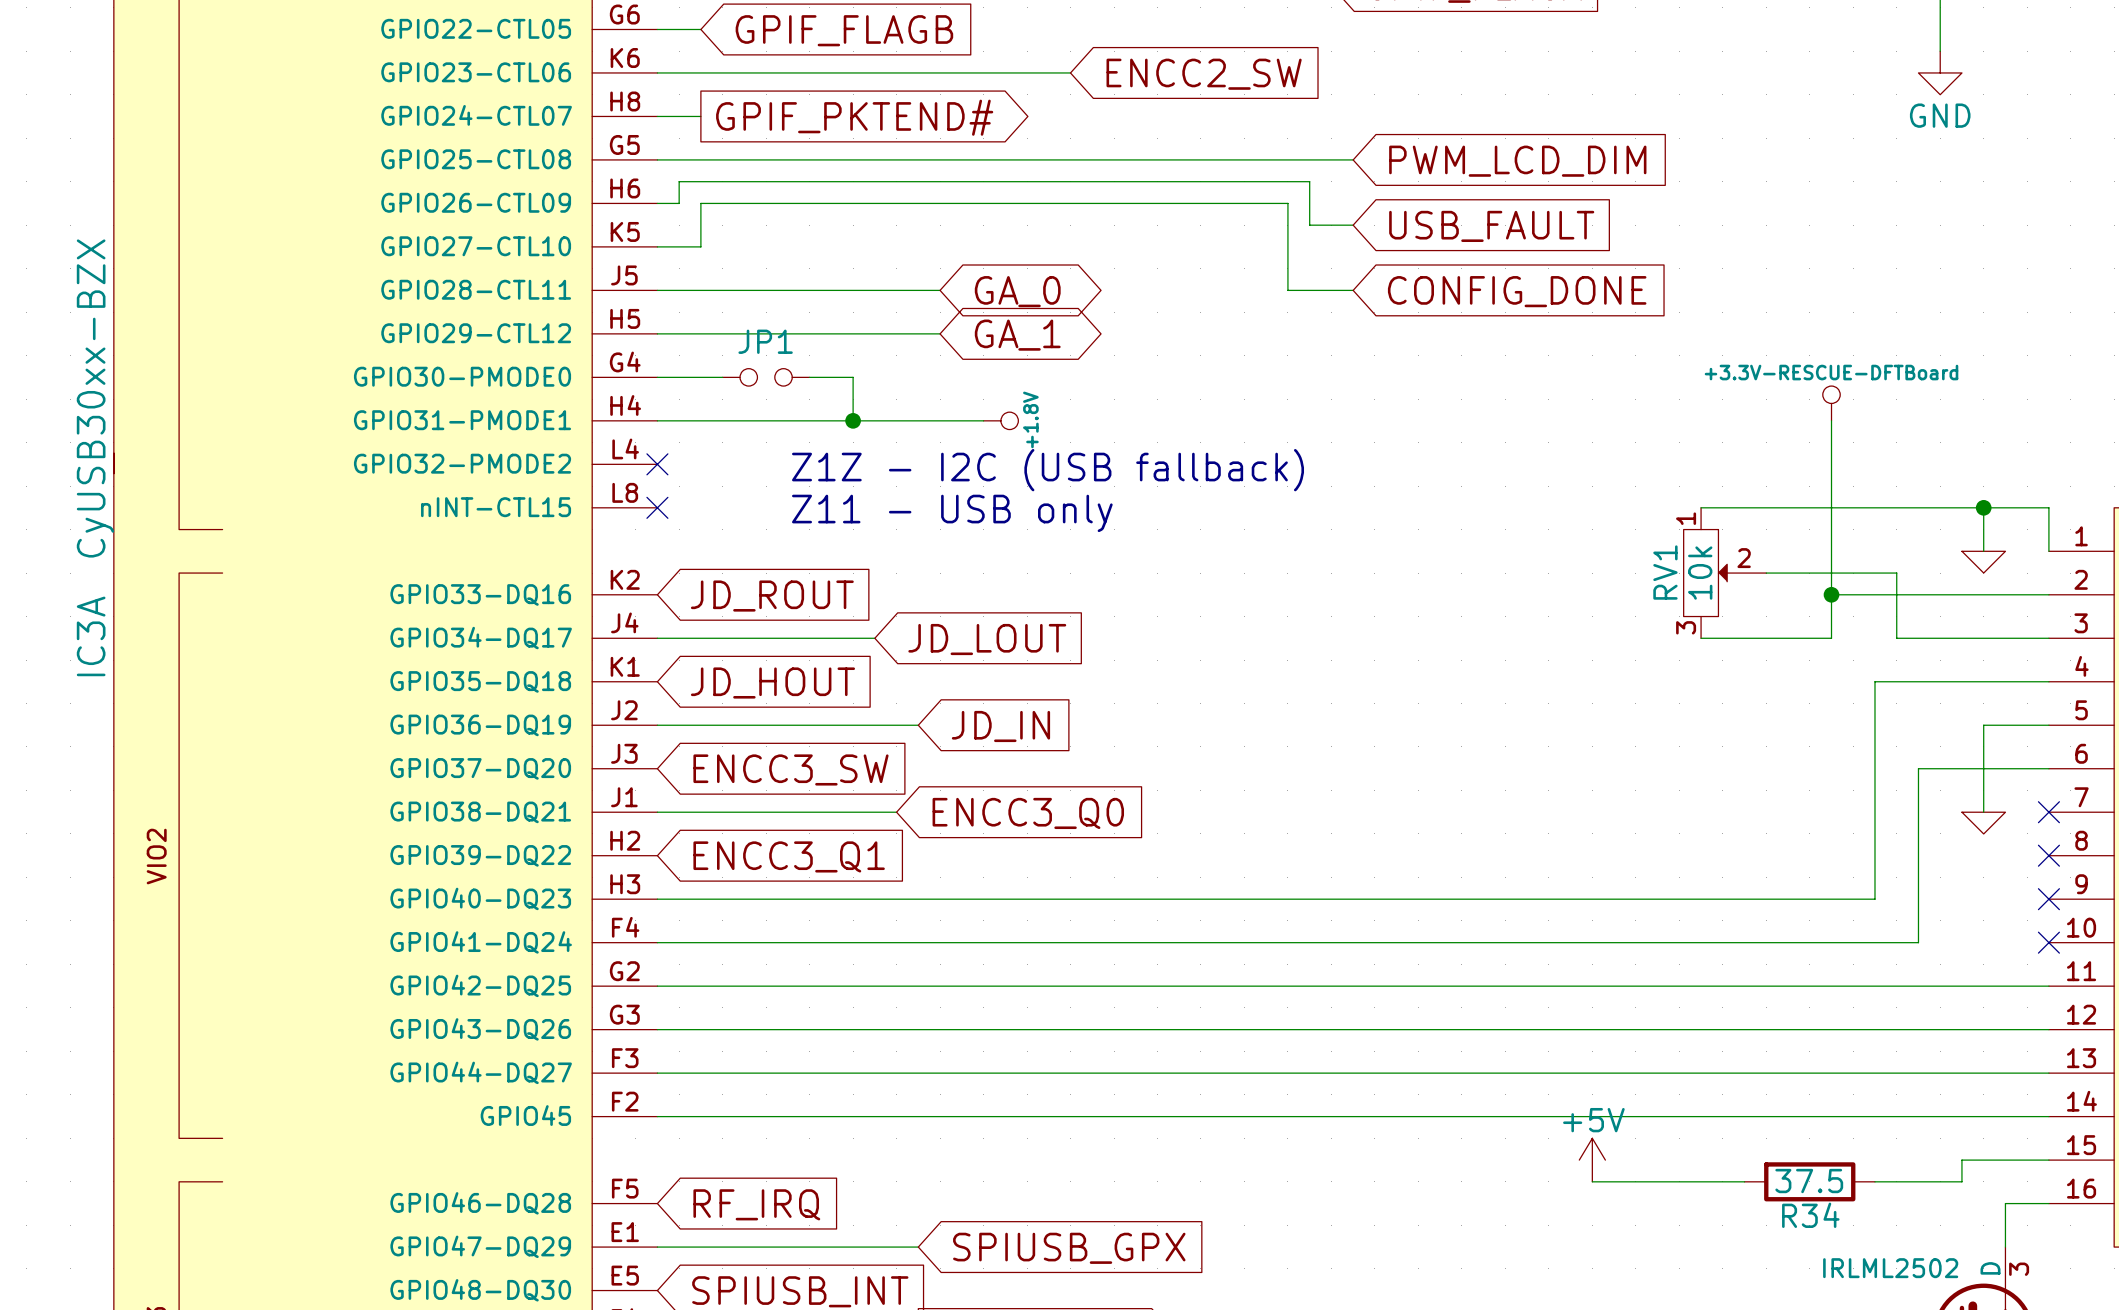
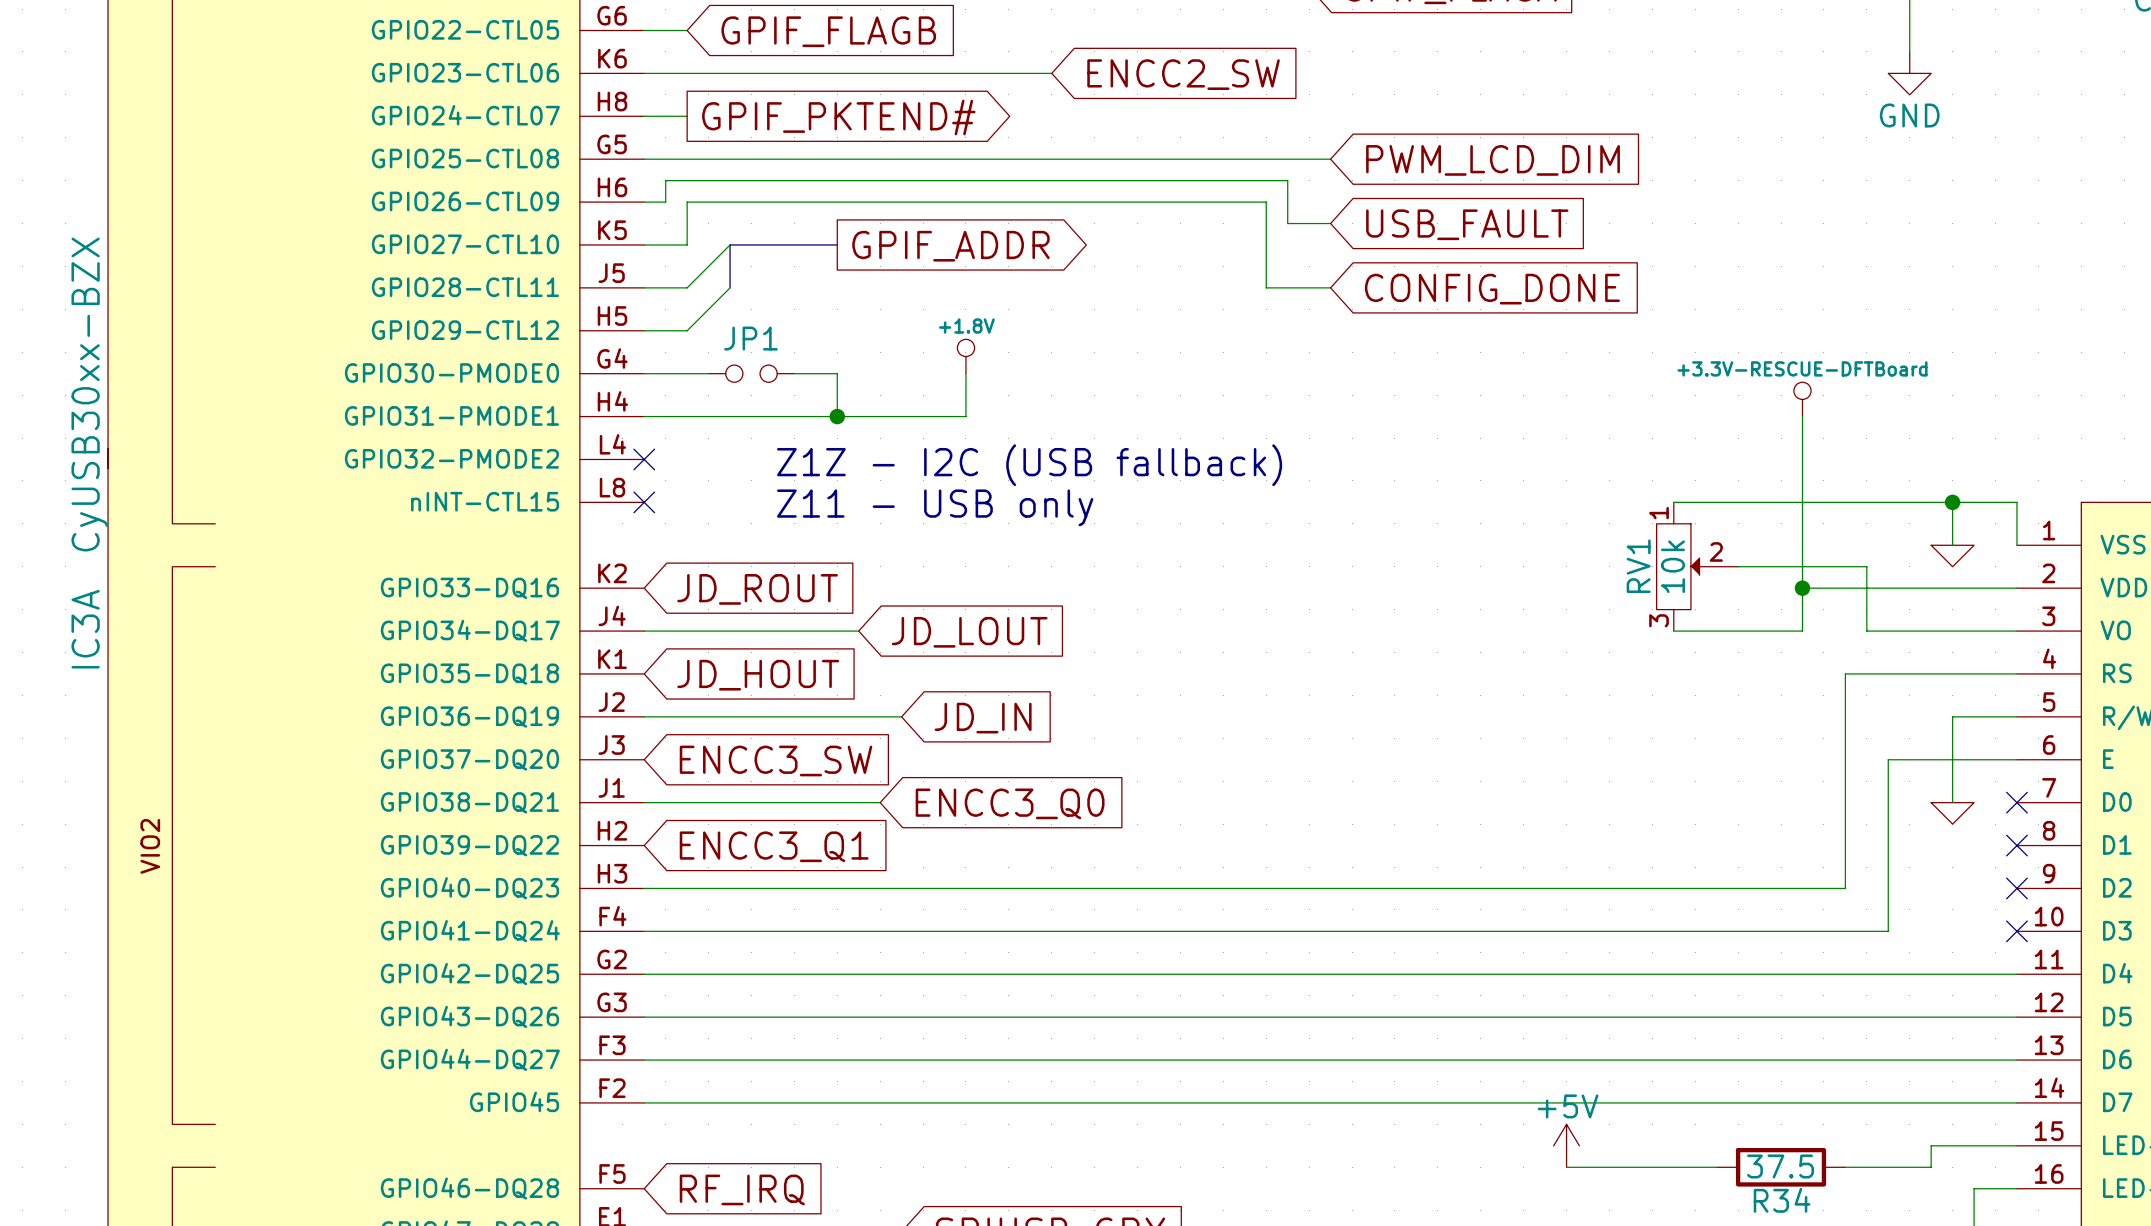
bus: none -> (837, 244) (730, 244) (730, 287)
global label: none -> GPIF_ADDR (950, 246)
wire: (700, 290) (940, 290) -> (687, 287) (730, 244)
global label: GA_0 (1017, 291) -> none
wire: (700, 333) (940, 333) -> (687, 330) (730, 287)
global label: GA_1 (1017, 335) -> none
wire: none -> (965, 373) (965, 416)
power symbol rotation: 0° (1000, 420) -> 90° counterclockwise (965, 356)
power symbol position: +1.8V (1000, 420) -> +1.8V (965, 356)

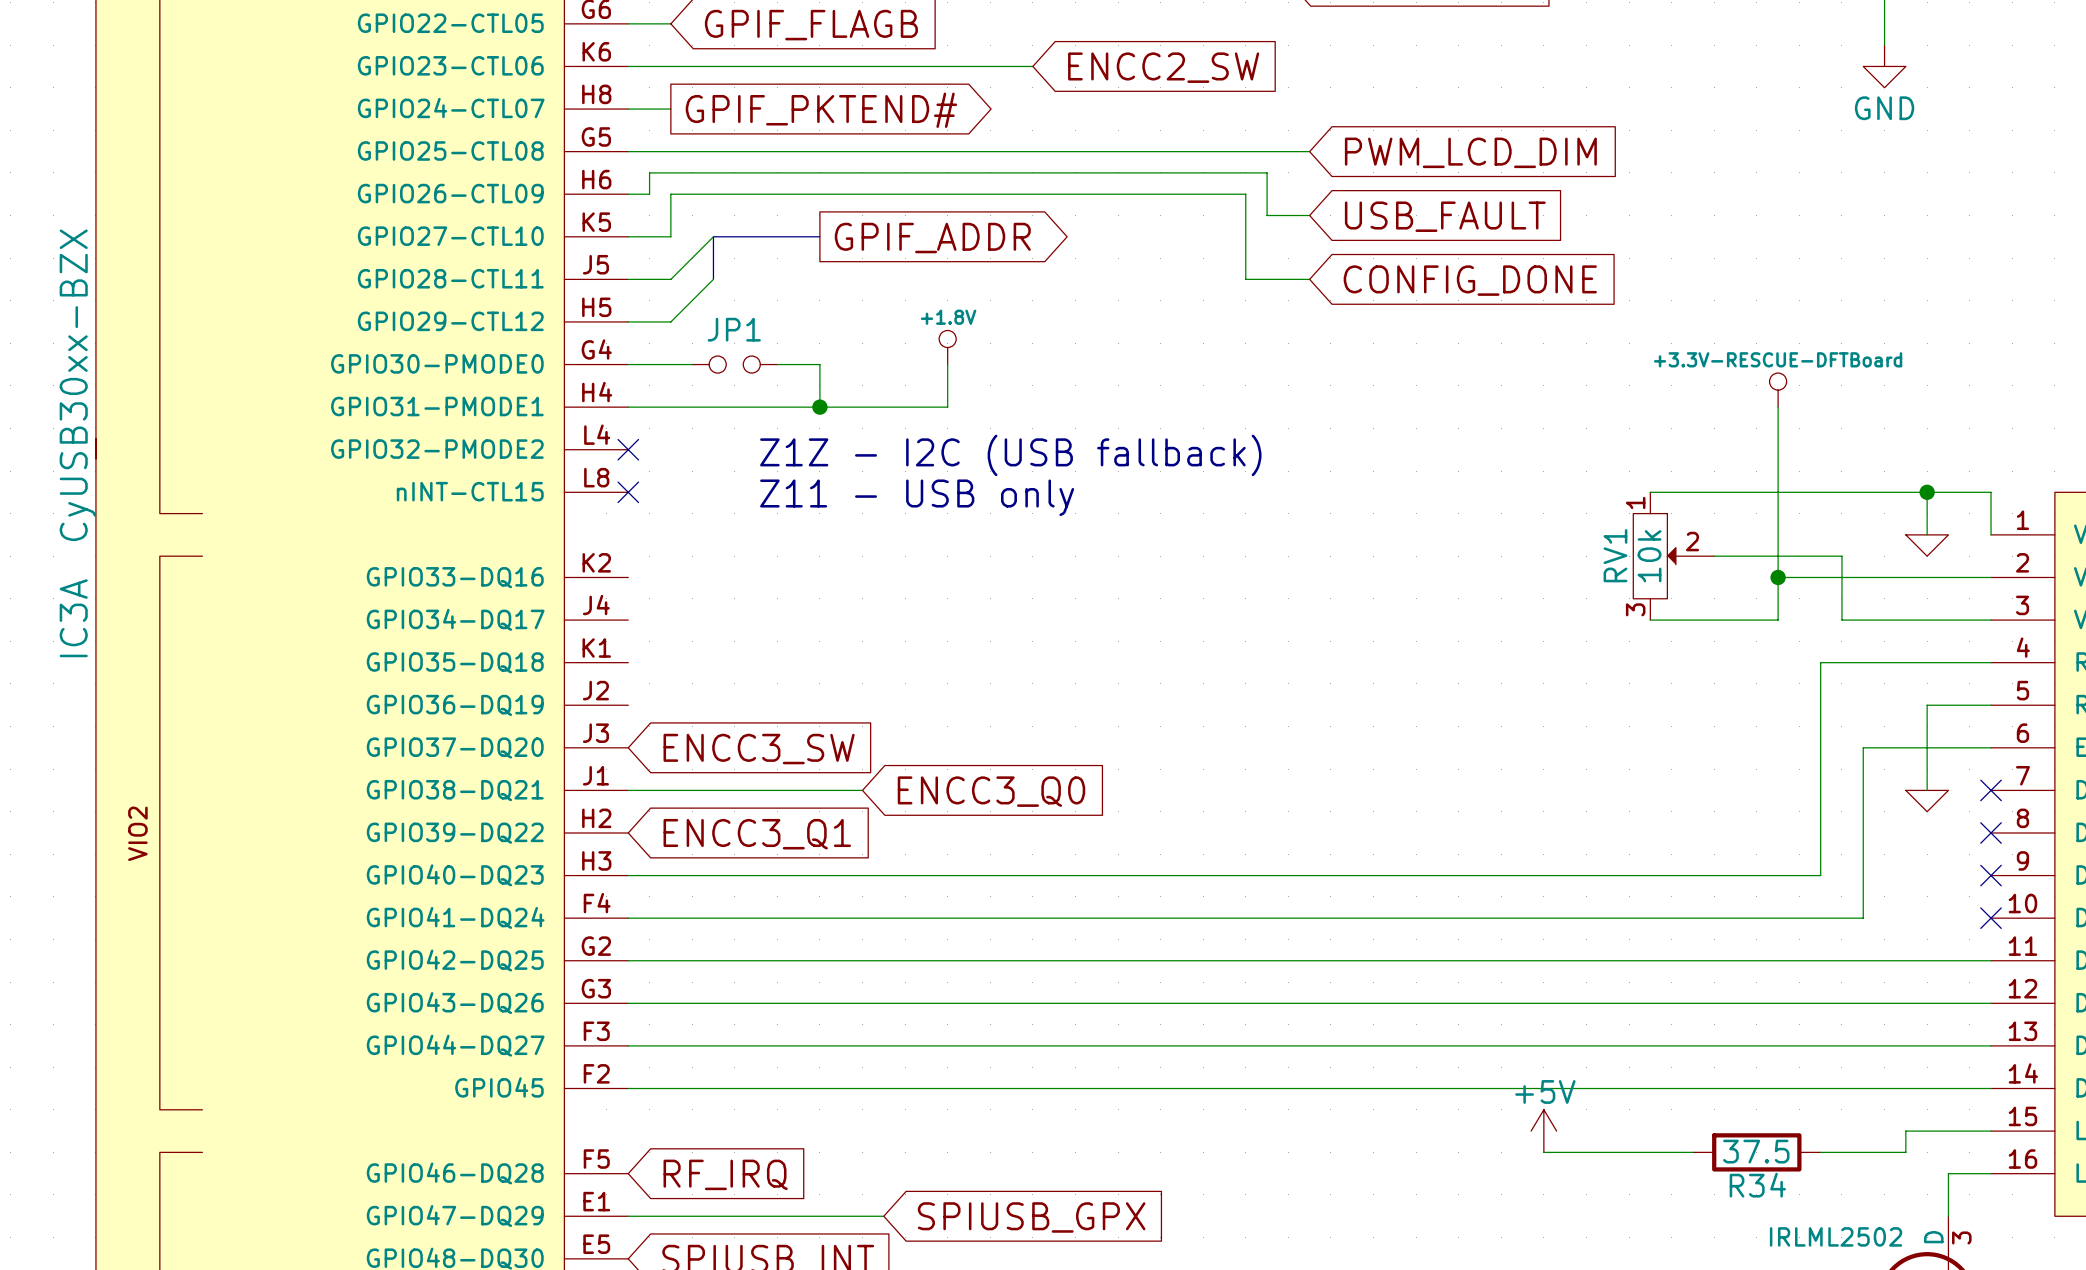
global label: JD_ROUT (757, 589) -> none
wire: (644, 631) (858, 631) -> none
global label: JD_LOUT (969, 632) -> none
global label: JD_HOUT (758, 675) -> none
wire: (644, 716) (901, 716) -> none
global label: JD_IN (983, 718) -> none

